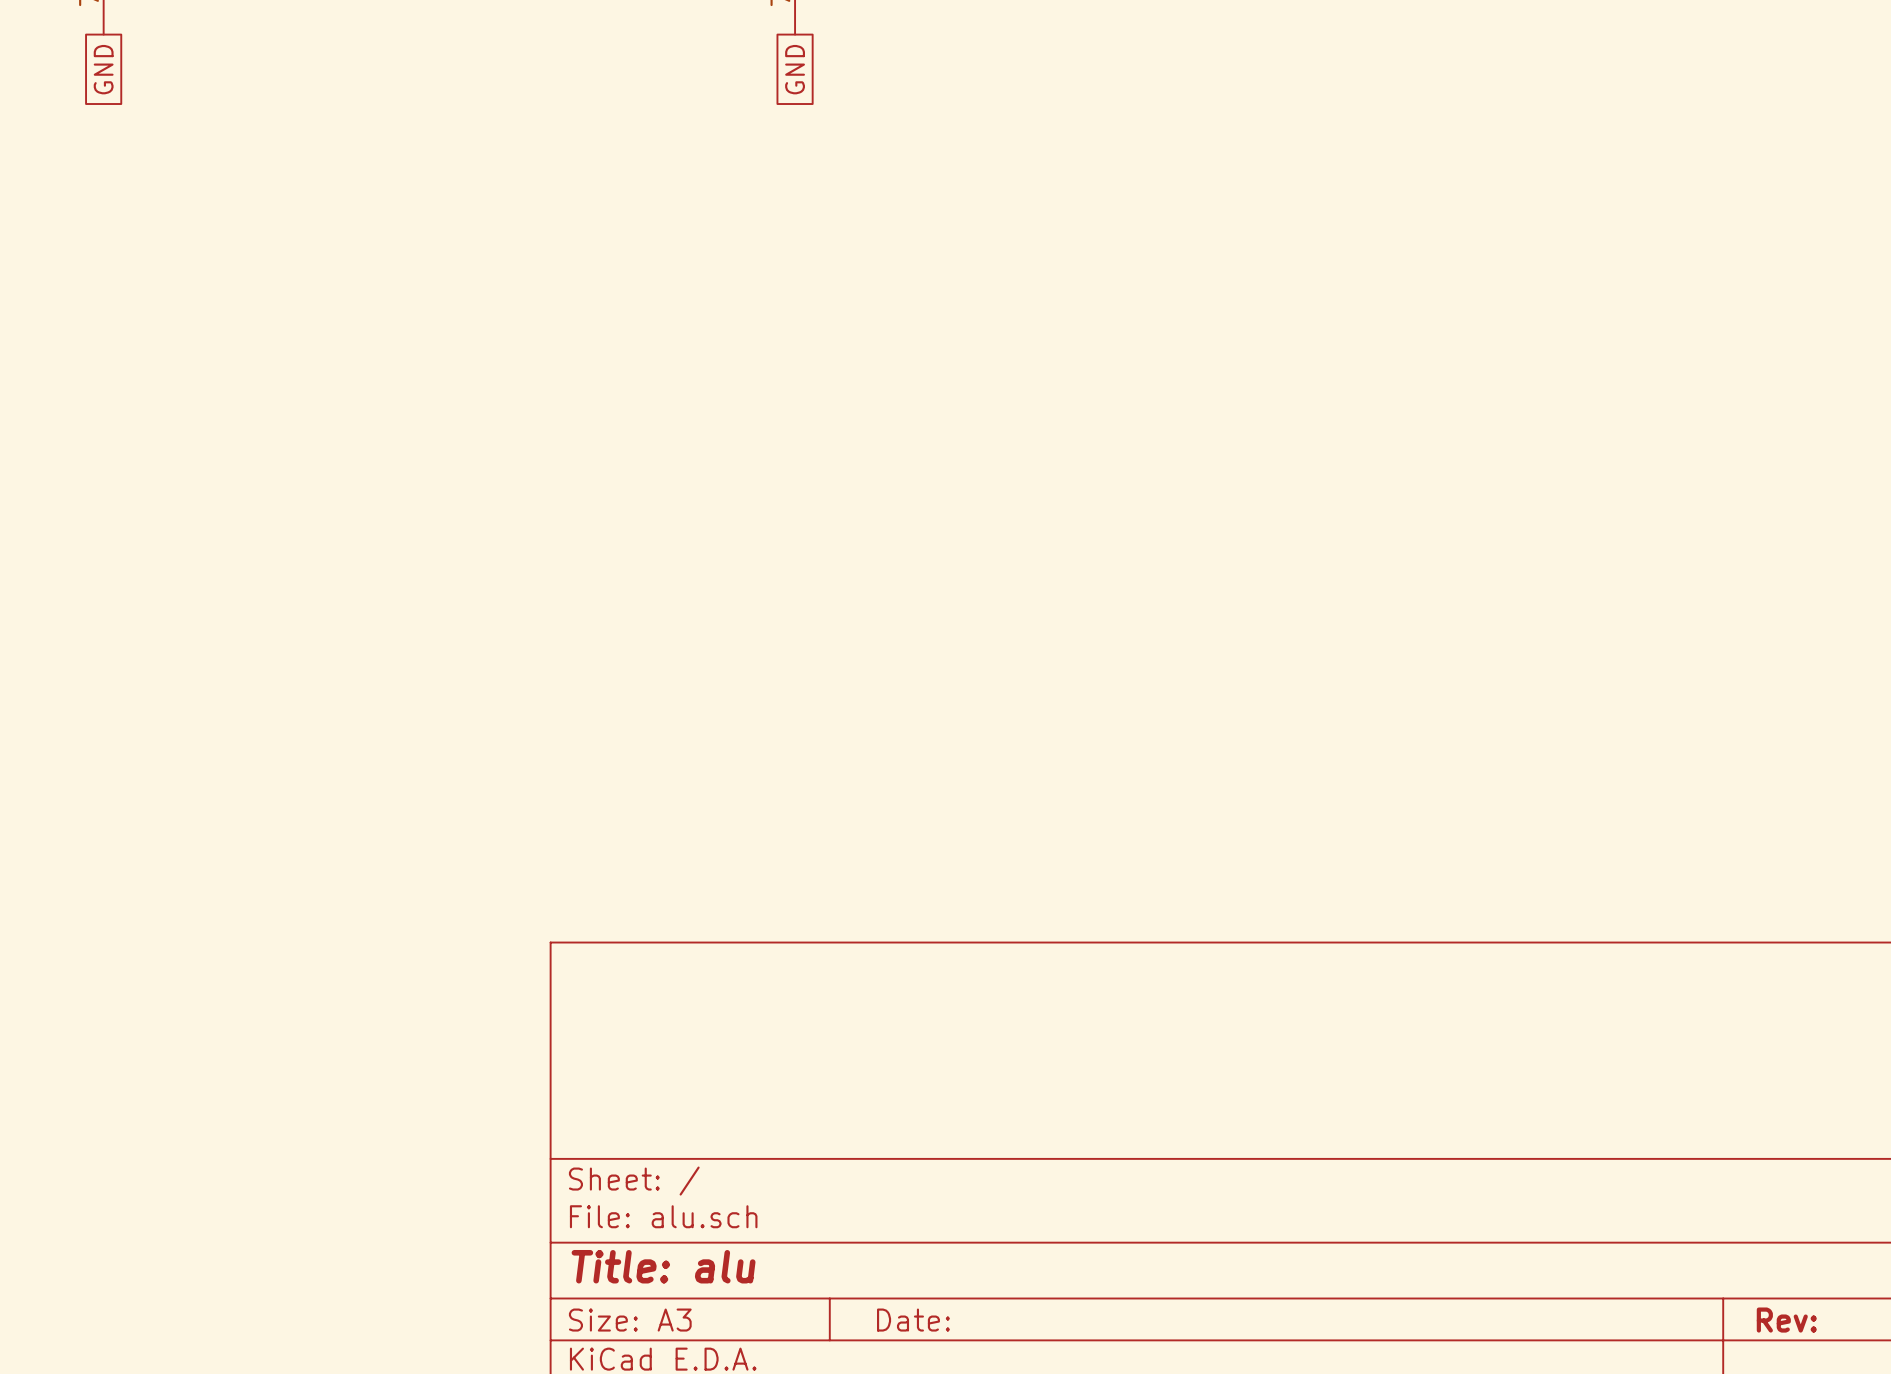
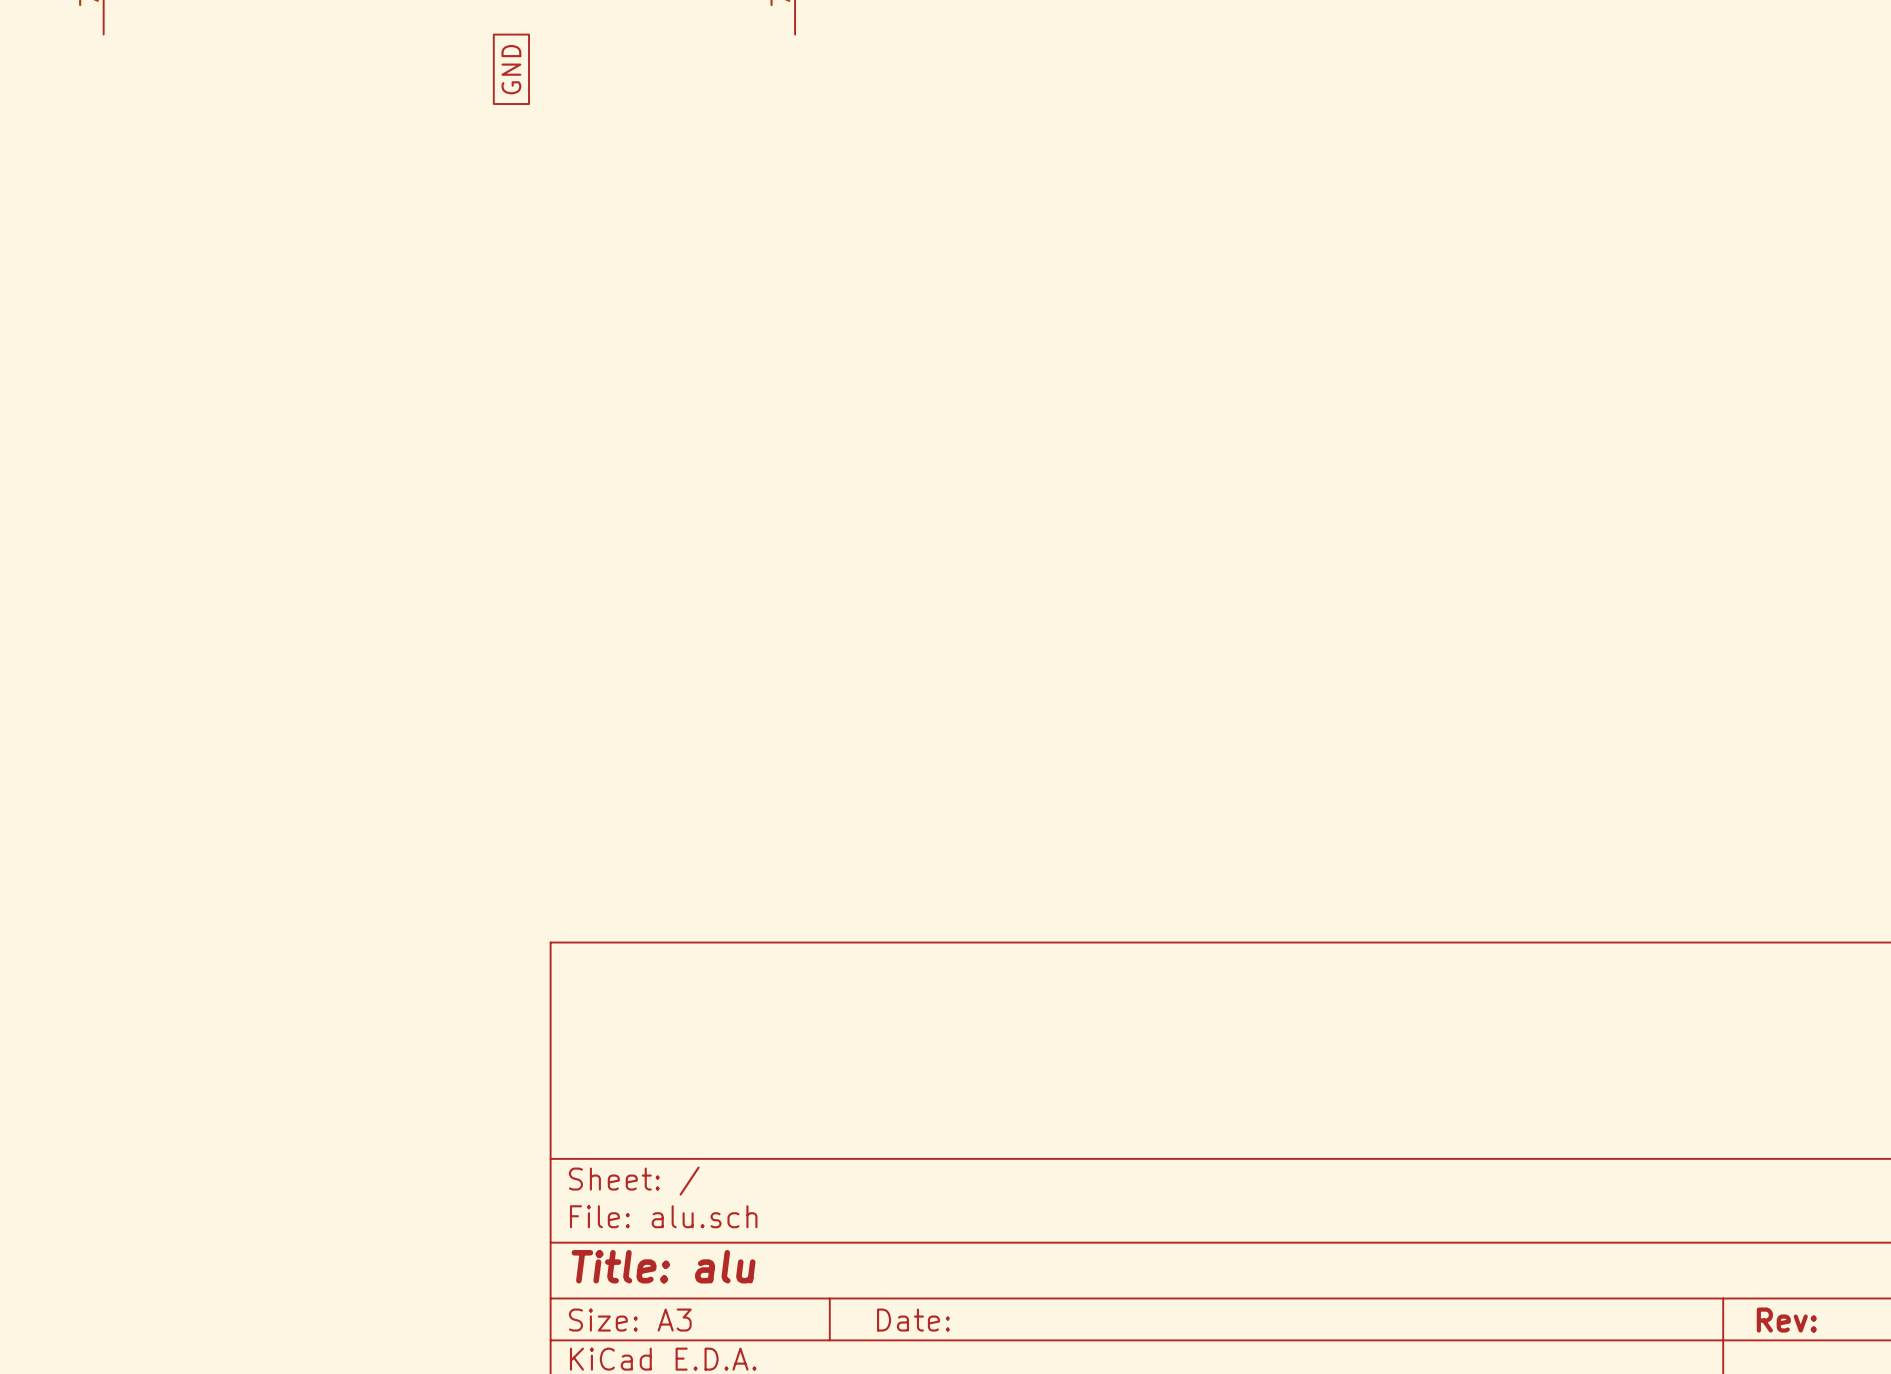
global label: GND (103, 69) -> none
global label: none -> GND (511, 69)
global label: GND (795, 69) -> none

